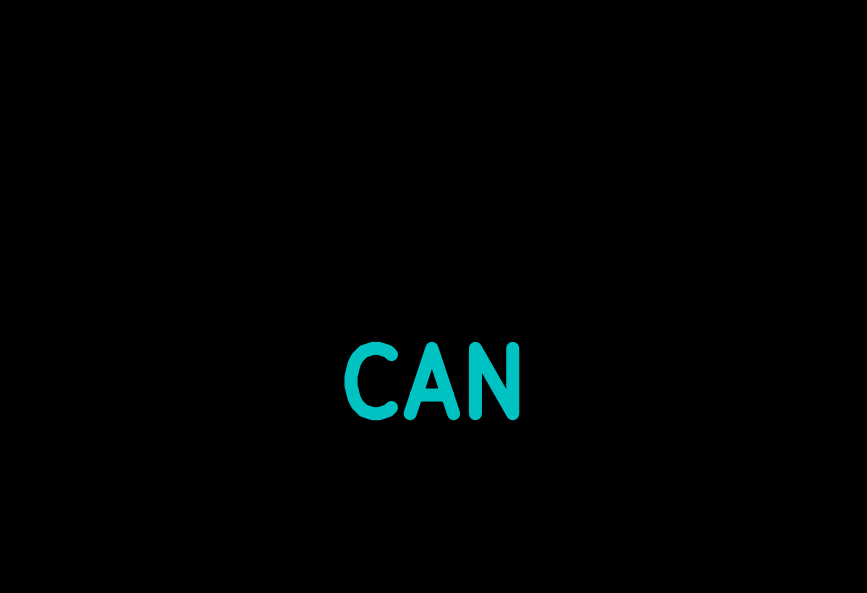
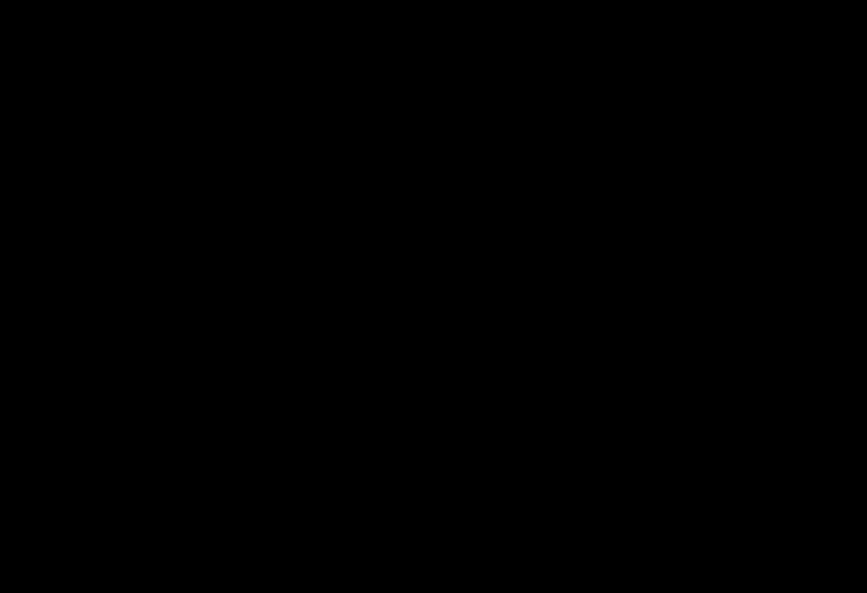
text: CAN (431, 381) -> none

